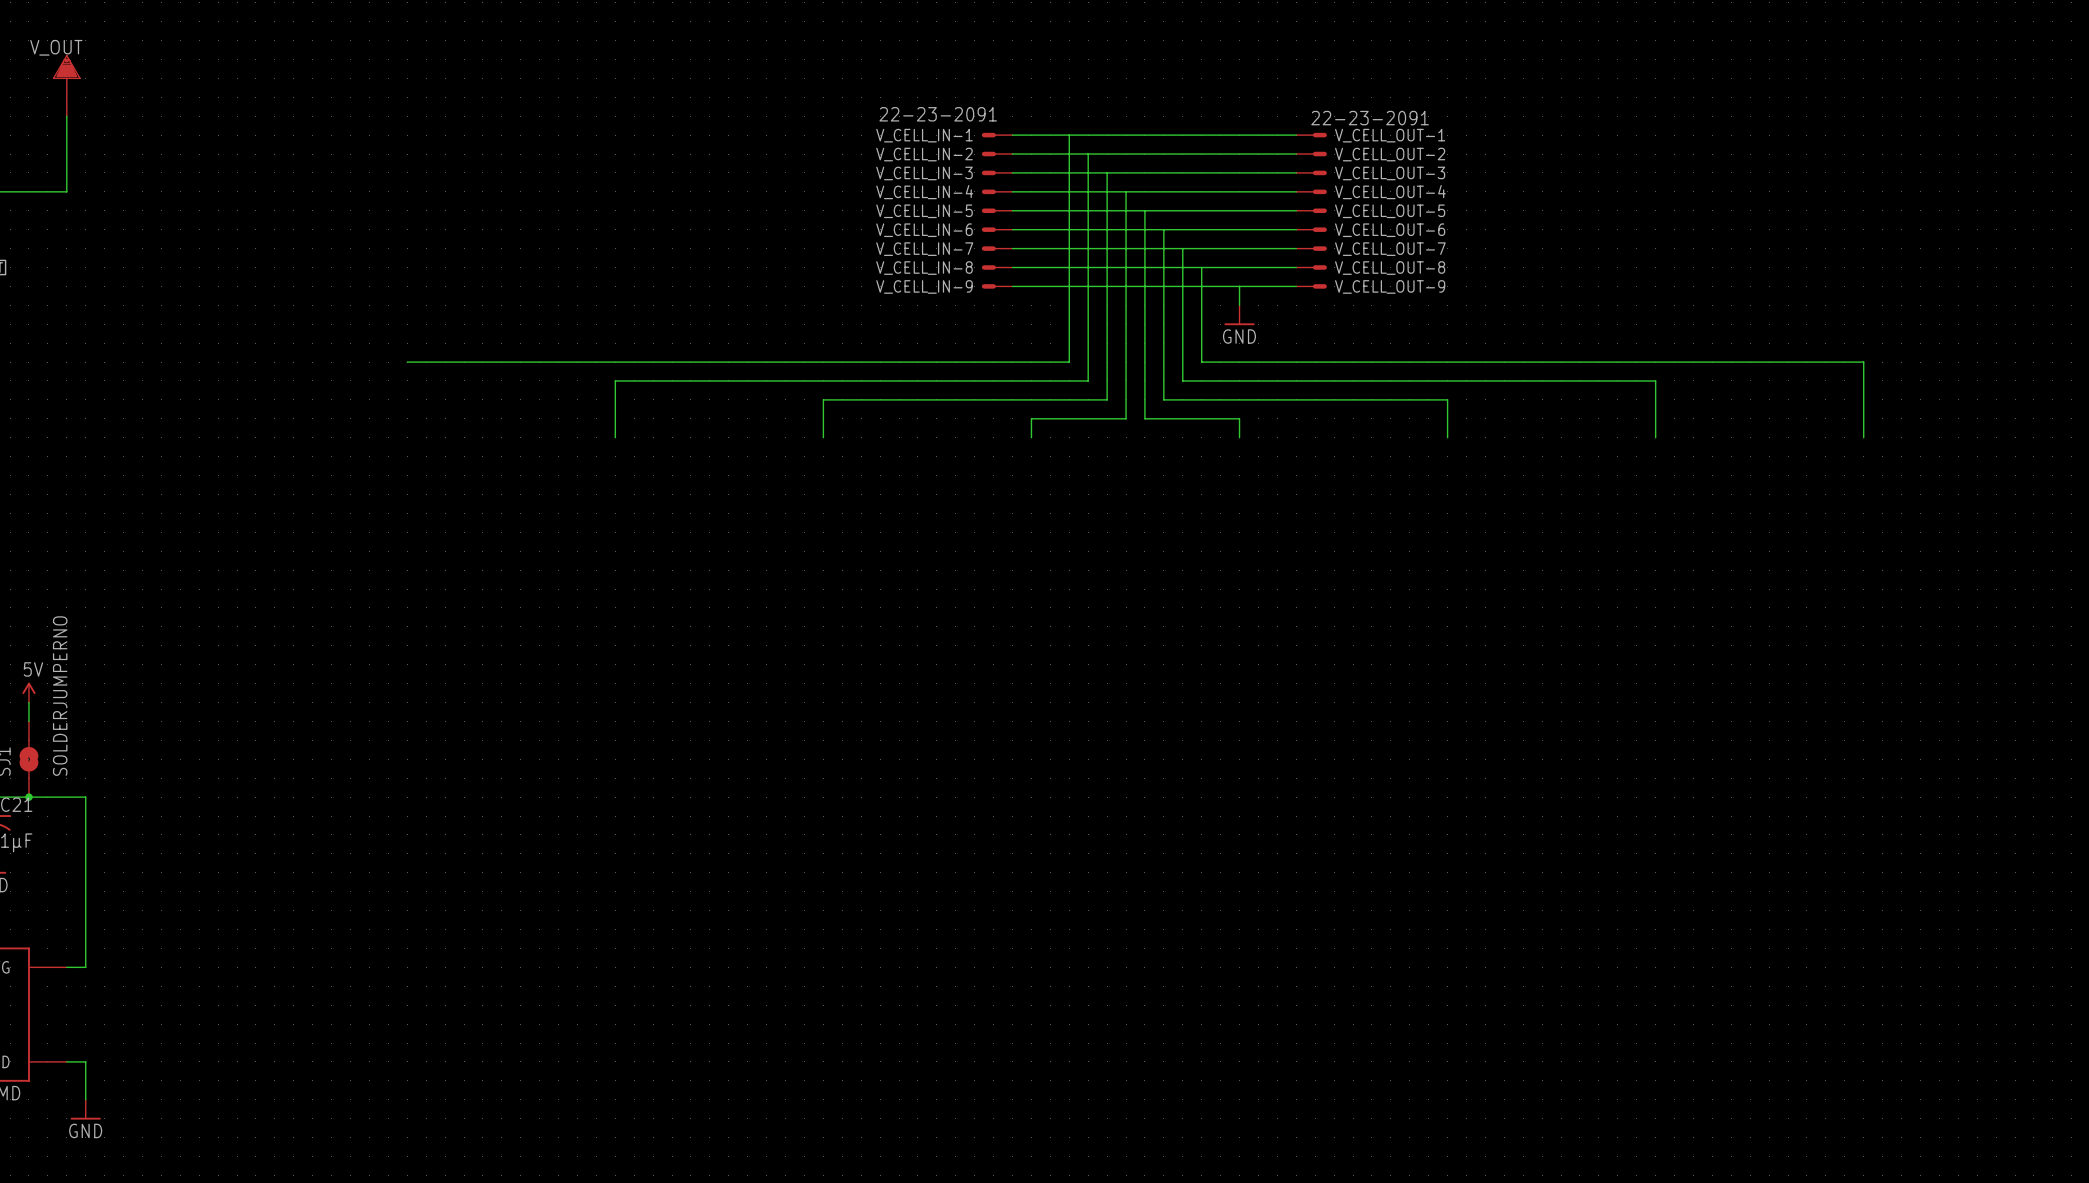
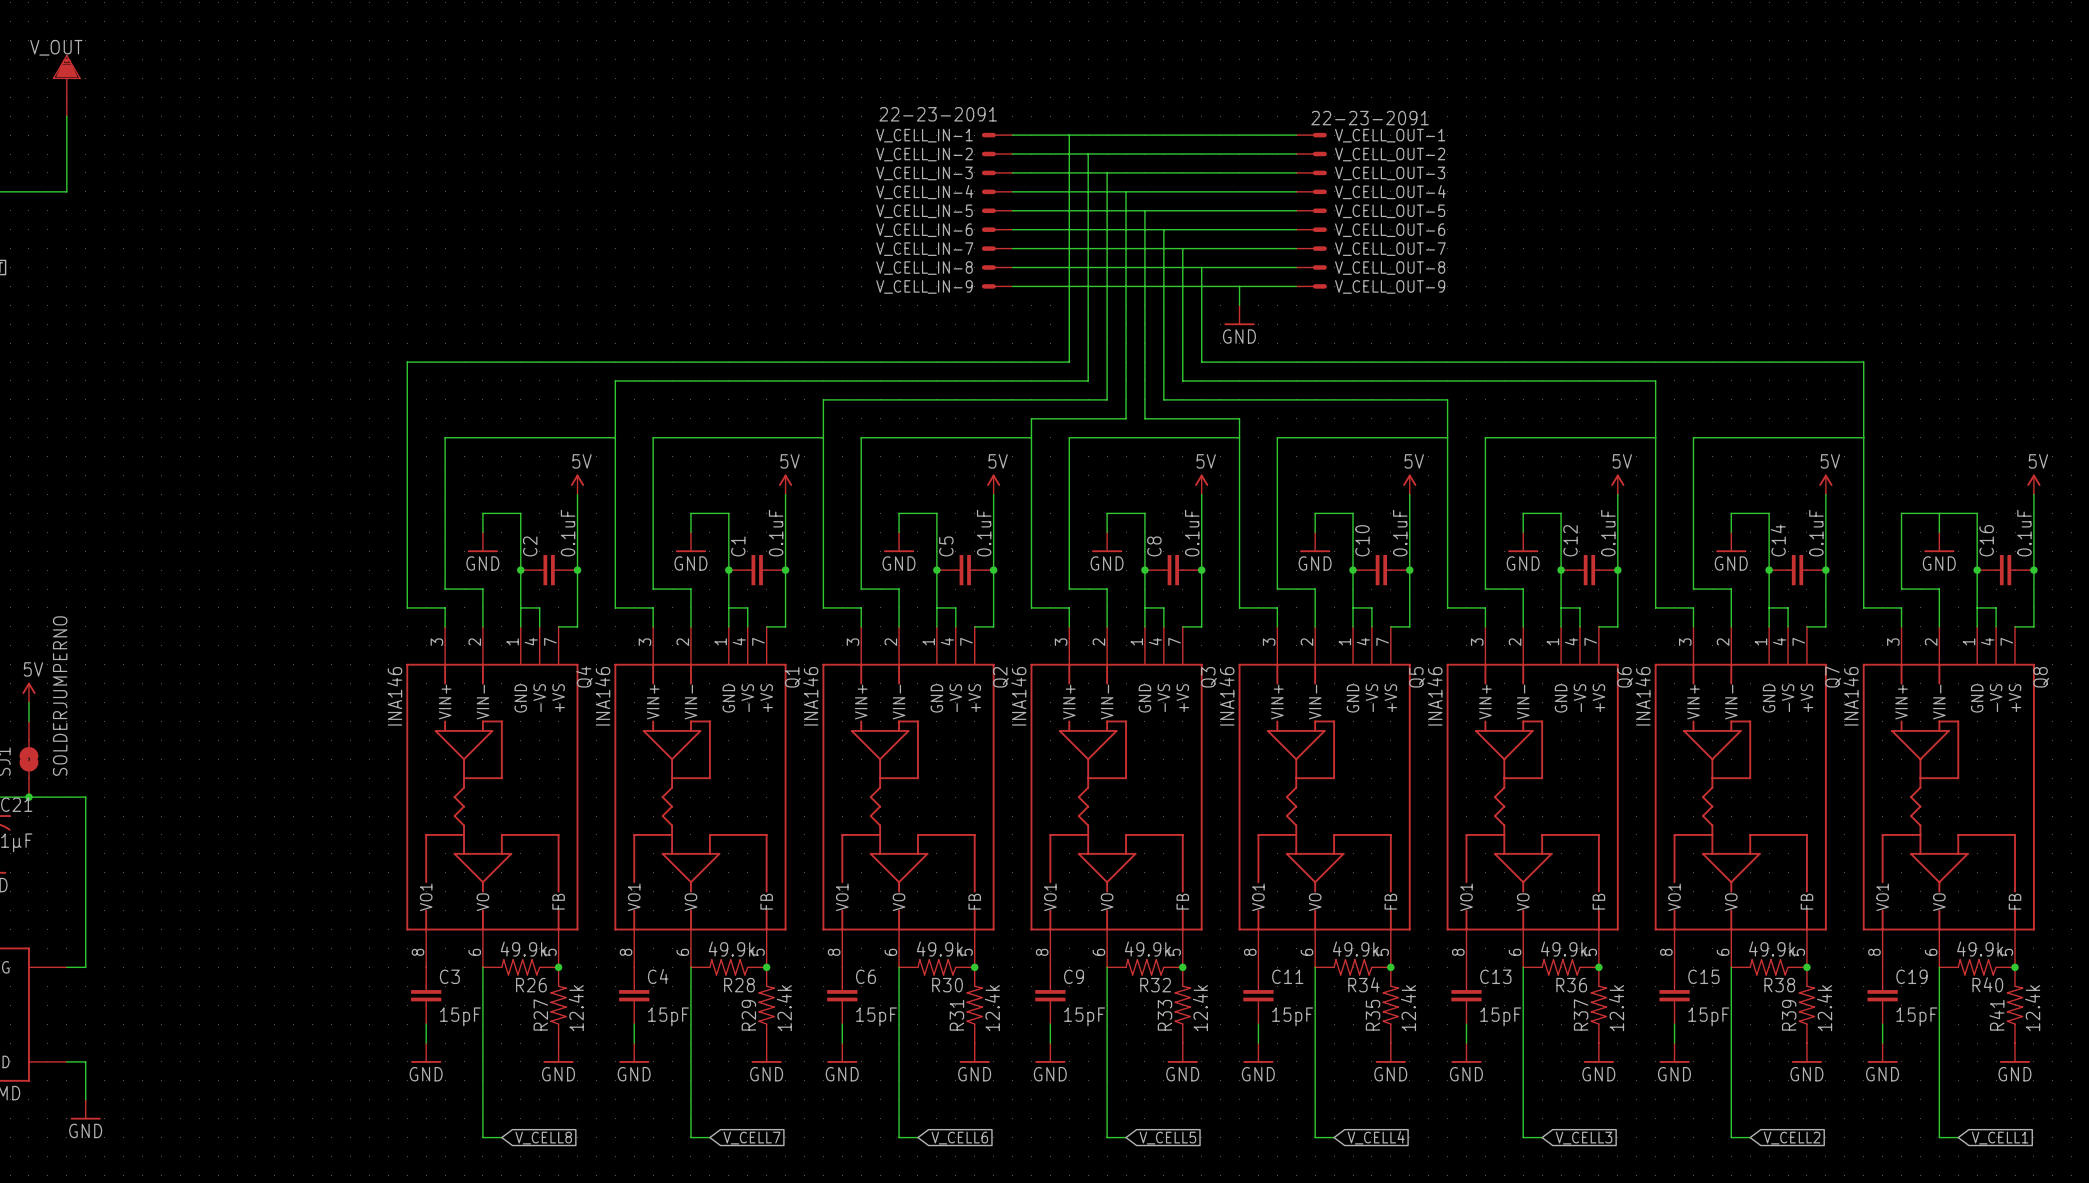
wire: none -> (407, 362) (407, 607) (445, 607) (445, 626)
power symbol: none -> 5V (577, 484)
power symbol: none -> 5V (785, 484)
power symbol: none -> 5V (993, 484)
power symbol: none -> 5V (1201, 484)
power symbol: none -> 5V (1409, 484)
power symbol: none -> 5V (1617, 484)
power symbol: none -> 5V (1825, 484)
power symbol: none -> 5V (2033, 484)
wire: none -> (577, 494) (577, 626) (558, 626)
wire: none -> (785, 494) (785, 626) (766, 626)
wire: none -> (993, 494) (993, 626) (974, 626)
wire: none -> (1201, 494) (1201, 626) (1182, 626)
wire: none -> (1409, 494) (1409, 626) (1390, 626)
wire: none -> (1617, 494) (1617, 626) (1598, 626)
wire: none -> (1825, 494) (1825, 626) (1806, 626)
wire: none -> (2033, 494) (2033, 626) (2015, 626)
wire: none -> (1939, 513) (1939, 532)
wire: none -> (482, 532) (482, 513) (520, 513) (520, 626)
wire: none -> (690, 532) (690, 513) (728, 513) (728, 626)
wire: none -> (899, 532) (899, 513) (936, 513) (936, 626)
wire: none -> (1107, 532) (1107, 513) (1144, 513) (1144, 626)
wire: none -> (1315, 532) (1315, 513) (1353, 513) (1353, 626)
wire: none -> (1523, 532) (1523, 513) (1561, 513) (1561, 626)
wire: none -> (1731, 532) (1731, 513) (1769, 513) (1769, 626)
power symbol: none -> GND (482, 542)
power symbol: none -> GND (690, 542)
power symbol: none -> GND (899, 542)
power symbol: none -> GND (1107, 542)
power symbol: none -> GND (1315, 542)
power symbol: none -> GND (1523, 542)
power symbol: none -> GND (1731, 542)
power symbol: none -> GND (1939, 542)
junction: none -> (520, 570)
C2: none -> 0.1uF (549, 570)
junction: none -> (577, 570)
junction: none -> (728, 570)
C1: none -> 0.1uF (757, 570)
junction: none -> (785, 570)
junction: none -> (936, 570)
C5: none -> 0.1uF (965, 570)
junction: none -> (993, 570)
junction: none -> (1144, 570)
C8: none -> 0.1uF (1173, 570)
junction: none -> (1201, 570)
junction: none -> (1353, 570)
C10: none -> 0.1uF (1381, 570)
junction: none -> (1409, 570)
junction: none -> (1561, 570)
C12: none -> 0.1uF (1589, 570)
junction: none -> (1617, 570)
junction: none -> (1769, 570)
C14: none -> 0.1uF (1797, 570)
junction: none -> (1825, 570)
junction: none -> (1977, 570)
C16: none -> 0.1uF (2005, 570)
junction: none -> (2033, 570)
wire: none -> (520, 607) (539, 607) (539, 626)
wire: none -> (728, 607) (747, 607) (747, 626)
wire: none -> (936, 607) (955, 607) (955, 626)
wire: none -> (1144, 607) (1163, 607) (1163, 626)
wire: none -> (1353, 607) (1371, 607) (1371, 626)
wire: none -> (1561, 607) (1579, 607) (1579, 626)
wire: none -> (1769, 607) (1788, 607) (1788, 626)
wire: none -> (1977, 607) (1996, 607) (1996, 626)
wire: none -> (482, 626) (482, 589) (445, 589) (445, 437) (615, 437) (615, 607) (653, 607) (653, 626)
wire: none -> (690, 626) (690, 589) (653, 589) (653, 437) (823, 437) (823, 607) (861, 607) (861, 626)
wire: none -> (899, 626) (899, 589) (861, 589) (861, 437) (1031, 437) (1031, 607) (1069, 607) (1069, 626)
wire: none -> (1107, 626) (1107, 589) (1069, 589) (1069, 437) (1239, 437) (1239, 607) (1277, 607) (1277, 626)
wire: none -> (1315, 626) (1315, 589) (1277, 589) (1277, 437) (1447, 437) (1447, 607) (1485, 607) (1485, 626)
wire: none -> (1523, 626) (1523, 589) (1485, 589) (1485, 437) (1655, 437) (1655, 607) (1693, 607) (1693, 626)
wire: none -> (1731, 626) (1731, 589) (1693, 589) (1693, 437) (1863, 437) (1863, 607) (1901, 607) (1901, 626)
wire: none -> (1939, 626) (1939, 589) (1901, 589) (1901, 513) (1977, 513) (1977, 626)
Q4: none -> INA146 (492, 797)
Q1: none -> INA146 (700, 797)
Q2: none -> INA146 (908, 797)
Q3: none -> INA146 (1116, 797)
Q5: none -> INA146 (1324, 797)
Q6: none -> INA146 (1532, 797)
Q7: none -> INA146 (1740, 797)
Q8: none -> INA146 (1948, 797)
wire: none -> (482, 967) (482, 1137) (501, 1137)
R26: none -> 49.9k (520, 967)
junction: none -> (558, 967)
wire: none -> (690, 967) (690, 1137) (709, 1137)
R28: none -> 49.9k (728, 967)
junction: none -> (766, 967)
wire: none -> (899, 967) (899, 1137) (917, 1137)
R30: none -> 49.9k (936, 967)
junction: none -> (974, 967)
wire: none -> (1107, 967) (1107, 1137) (1126, 1137)
R32: none -> 49.9k (1144, 967)
junction: none -> (1182, 967)
wire: none -> (1315, 967) (1315, 1137) (1334, 1137)
R34: none -> 49.9k (1353, 967)
junction: none -> (1390, 967)
wire: none -> (1523, 967) (1523, 1137) (1542, 1137)
R36: none -> 49.9k (1561, 967)
junction: none -> (1598, 967)
wire: none -> (1731, 967) (1731, 1137) (1750, 1137)
R38: none -> 49.9k (1769, 967)
junction: none -> (1806, 967)
wire: none -> (1939, 967) (1939, 1137) (1958, 1137)
R40: none -> 49.9k (1977, 967)
junction: none -> (2015, 967)
C3: none -> 15pF (426, 995)
C4: none -> 15pF (634, 995)
C6: none -> 15pF (842, 995)
C9: none -> 15pF (1050, 995)
C11: none -> 15pF (1258, 995)
C13: none -> 15pF (1466, 995)
C15: none -> 15pF (1674, 995)
C19: none -> 15pF (1882, 995)
R27: none -> 12.4k (558, 1005)
R29: none -> 12.4k (766, 1005)
R31: none -> 12.4k (974, 1005)
R33: none -> 12.4k (1182, 1005)
R35: none -> 12.4k (1390, 1005)
R37: none -> 12.4k (1598, 1005)
R39: none -> 12.4k (1806, 1005)
R41: none -> 12.4k (2015, 1005)
wire: none -> (426, 1024) (426, 1043)
wire: none -> (634, 1024) (634, 1043)
wire: none -> (842, 1024) (842, 1043)
wire: none -> (1050, 1024) (1050, 1043)
wire: none -> (1258, 1024) (1258, 1043)
wire: none -> (1466, 1024) (1466, 1043)
wire: none -> (1674, 1024) (1674, 1043)
wire: none -> (1882, 1024) (1882, 1043)
power symbol: none -> GND (426, 1052)
power symbol: none -> GND (558, 1052)
power symbol: none -> GND (634, 1052)
power symbol: none -> GND (766, 1052)
power symbol: none -> GND (842, 1052)
power symbol: none -> GND (974, 1052)
power symbol: none -> GND (1050, 1052)
power symbol: none -> GND (1182, 1052)
power symbol: none -> GND (1258, 1052)
power symbol: none -> GND (1390, 1052)
power symbol: none -> GND (1466, 1052)
power symbol: none -> GND (1598, 1052)
power symbol: none -> GND (1674, 1052)
power symbol: none -> GND (1806, 1052)
power symbol: none -> GND (1882, 1052)
power symbol: none -> GND (2015, 1052)
global label: none -> V_CELL4 (1376, 1137)
global label: none -> V_CELL8 (543, 1138)
global label: none -> V_CELL7 (752, 1138)
global label: none -> V_CELL6 (959, 1138)
global label: none -> V_CELL5 (1167, 1138)
global label: none -> V_CELL3 (1584, 1138)
global label: none -> V_CELL2 (1792, 1138)
global label: none -> V_CELL1 (2000, 1138)

